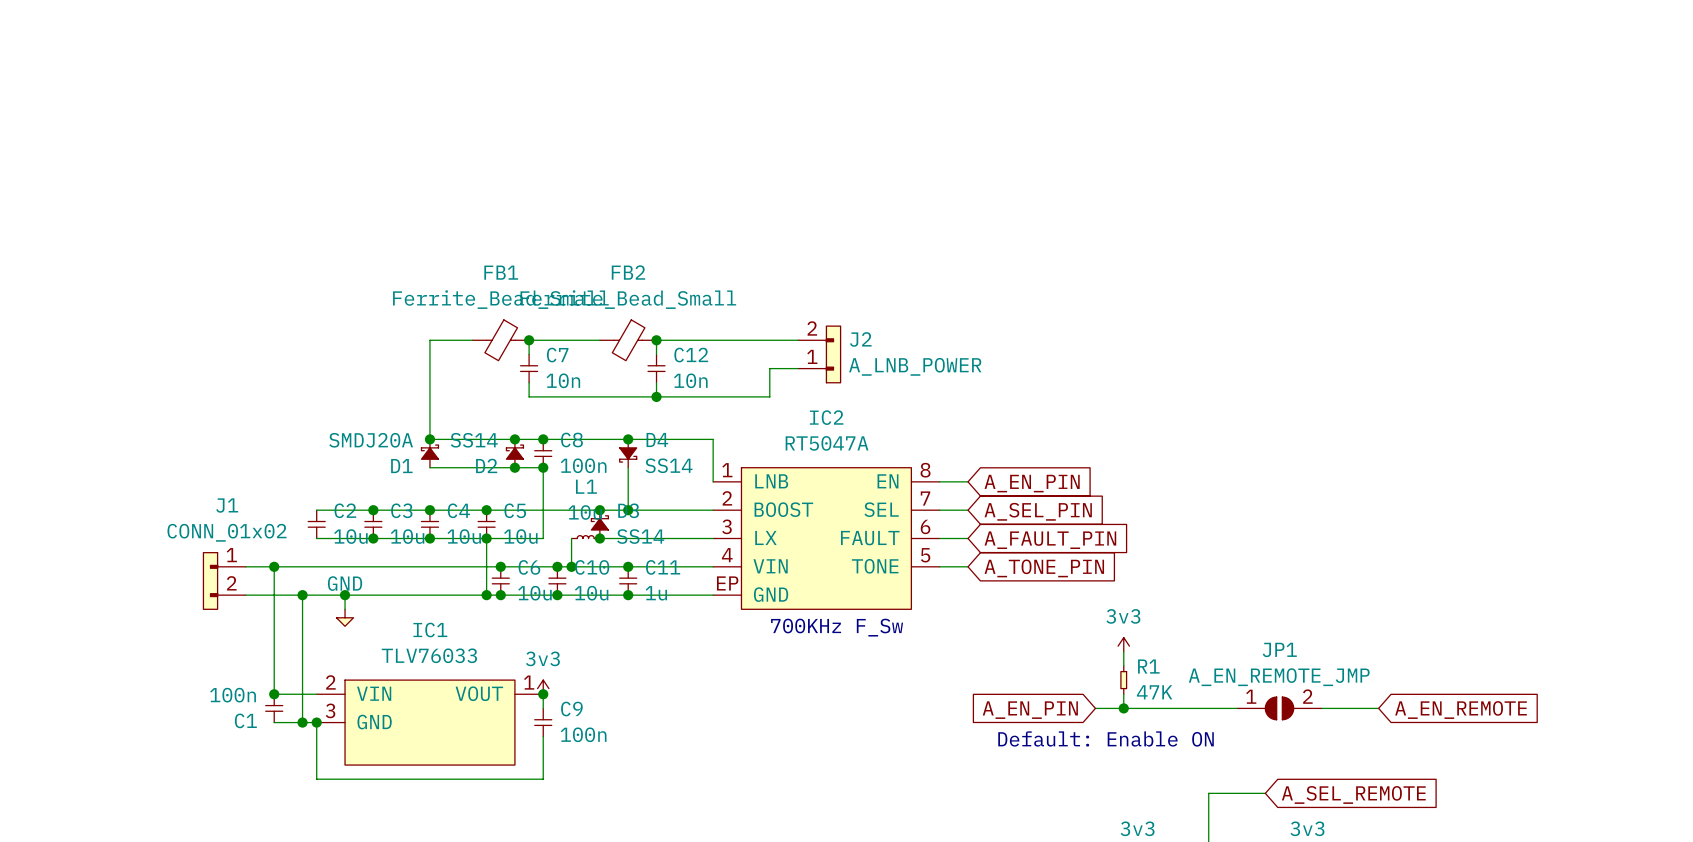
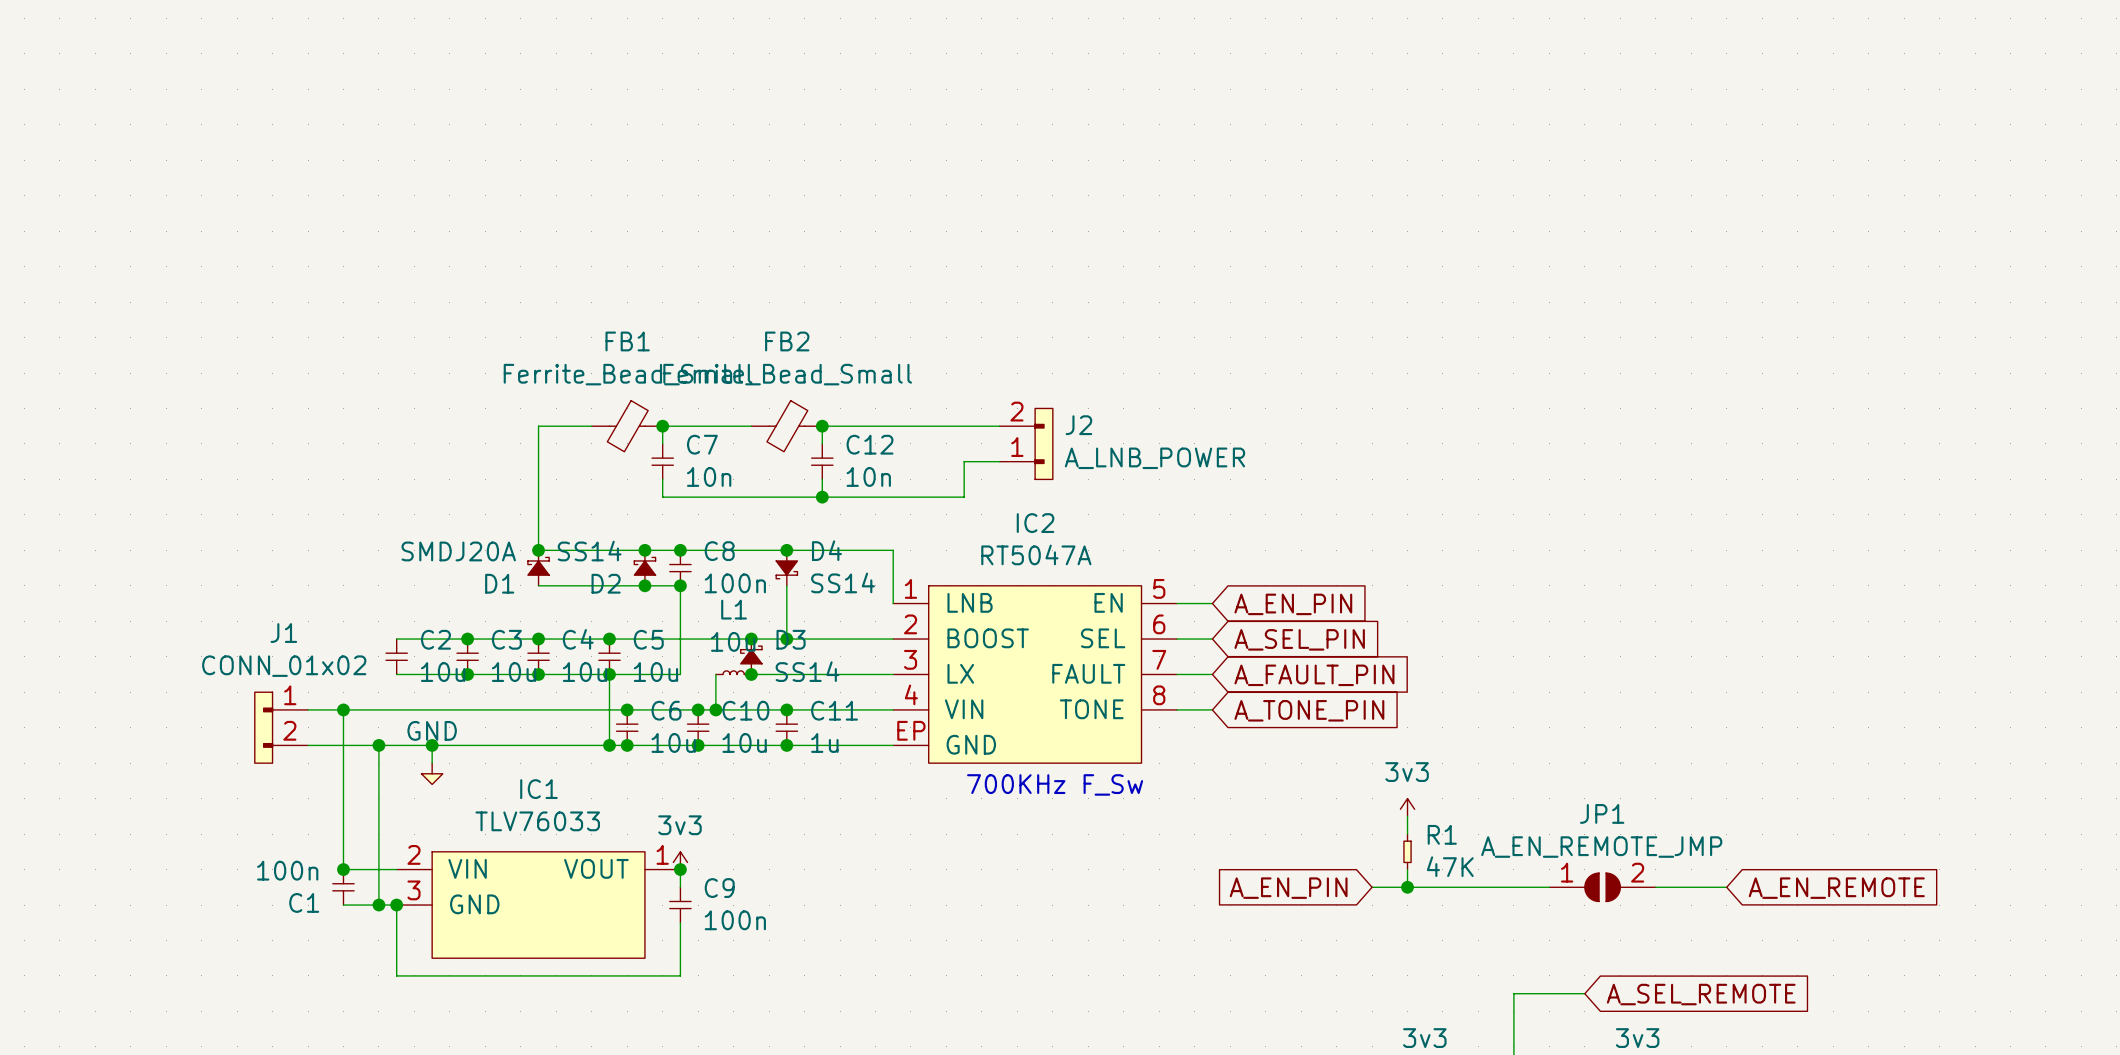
IC2 pin number: 8 (925, 470) -> 5 (1159, 588)
IC2 pin number: 7 (925, 498) -> 6 (1159, 624)
IC2 pin number: 6 (925, 526) -> 7 (1159, 659)
IC2 pin number: 5 (925, 555) -> 8 (1159, 695)
text: Default: Enable ON (1106, 738) -> none

